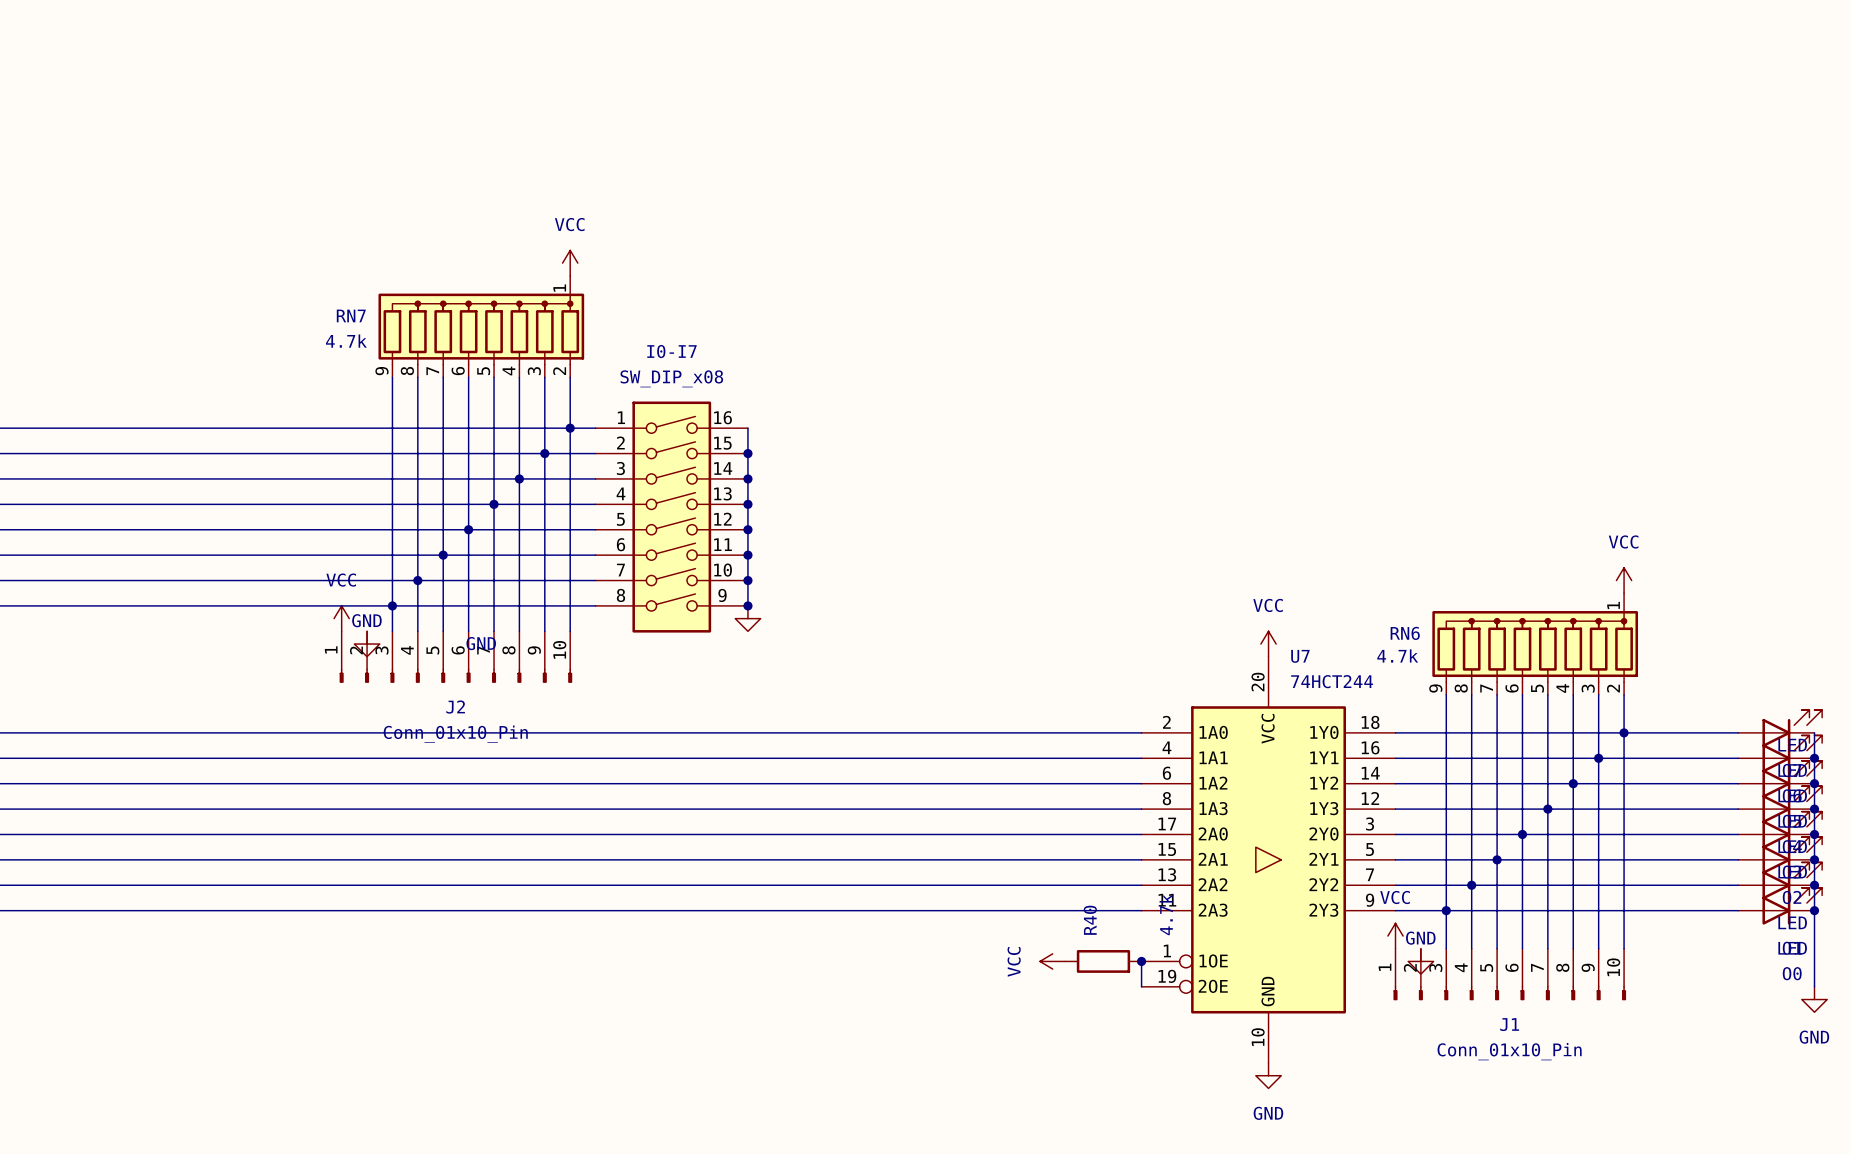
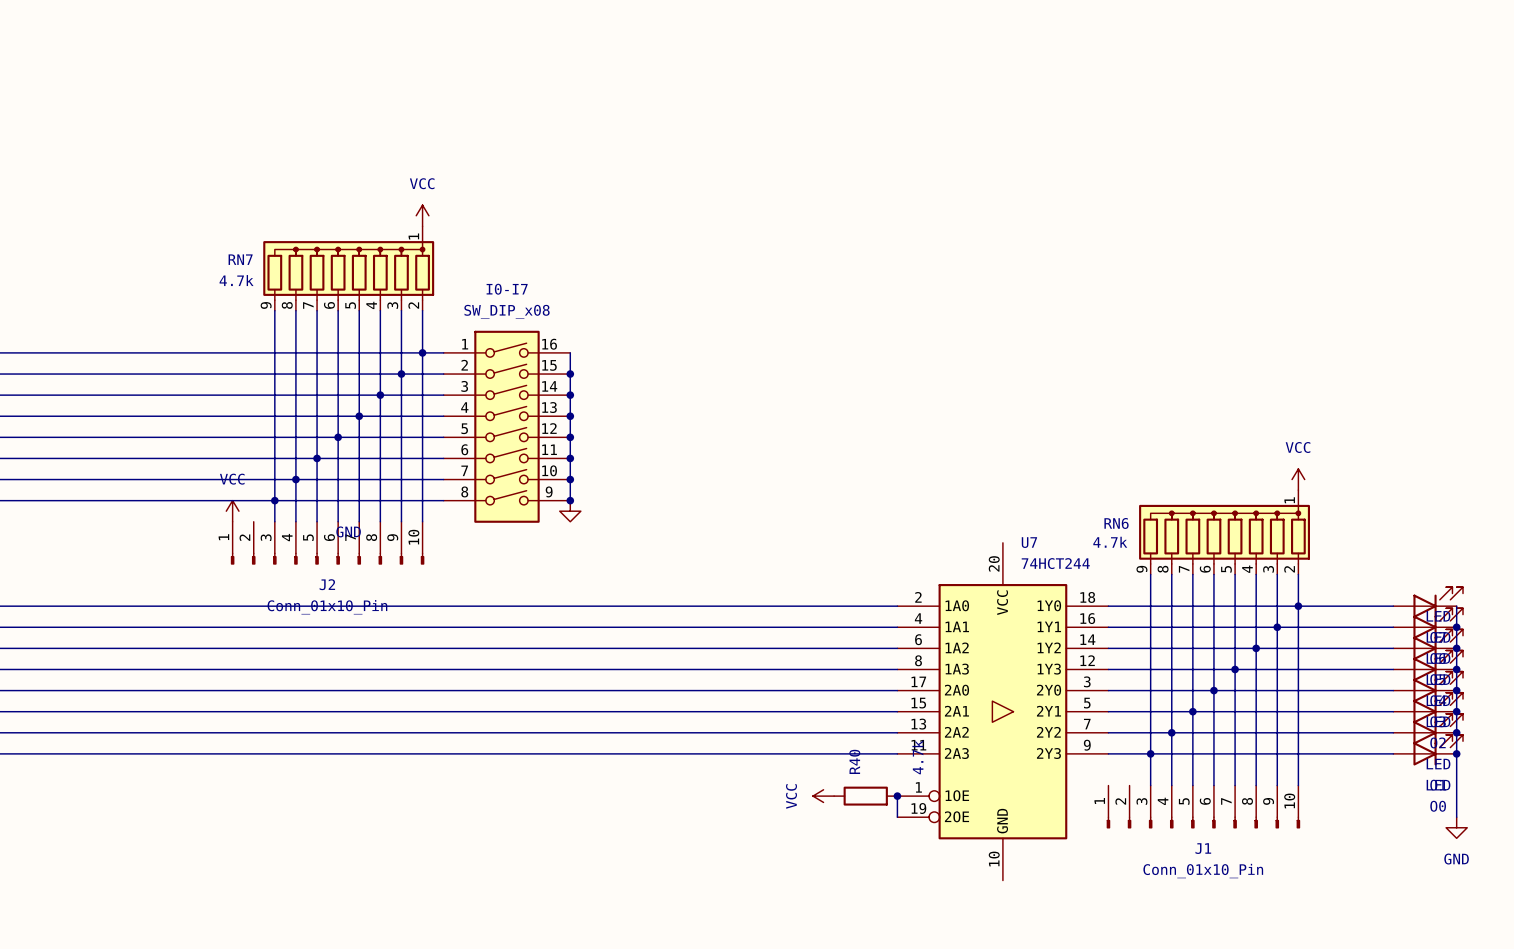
power symbol: GND (367, 644) -> none
power symbol: VCC (1268, 644) -> none
power symbol: VCC (1395, 936) -> none
power symbol: GND (1420, 961) -> none
power symbol: GND (1268, 1075) -> none

